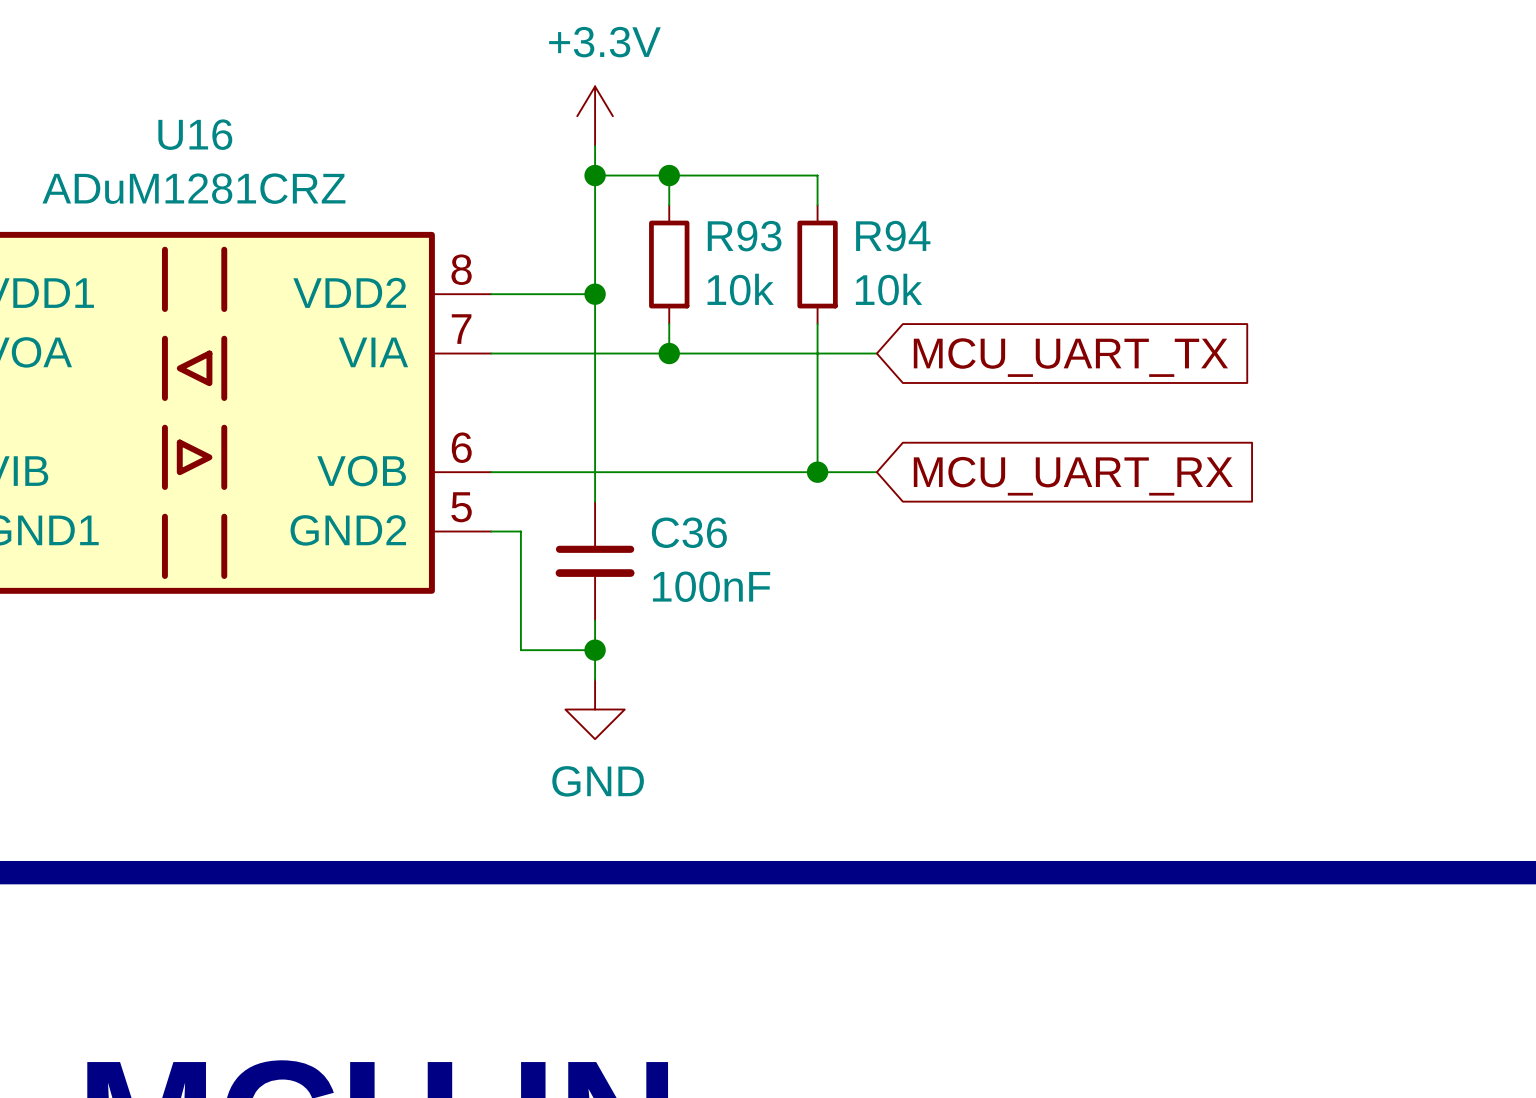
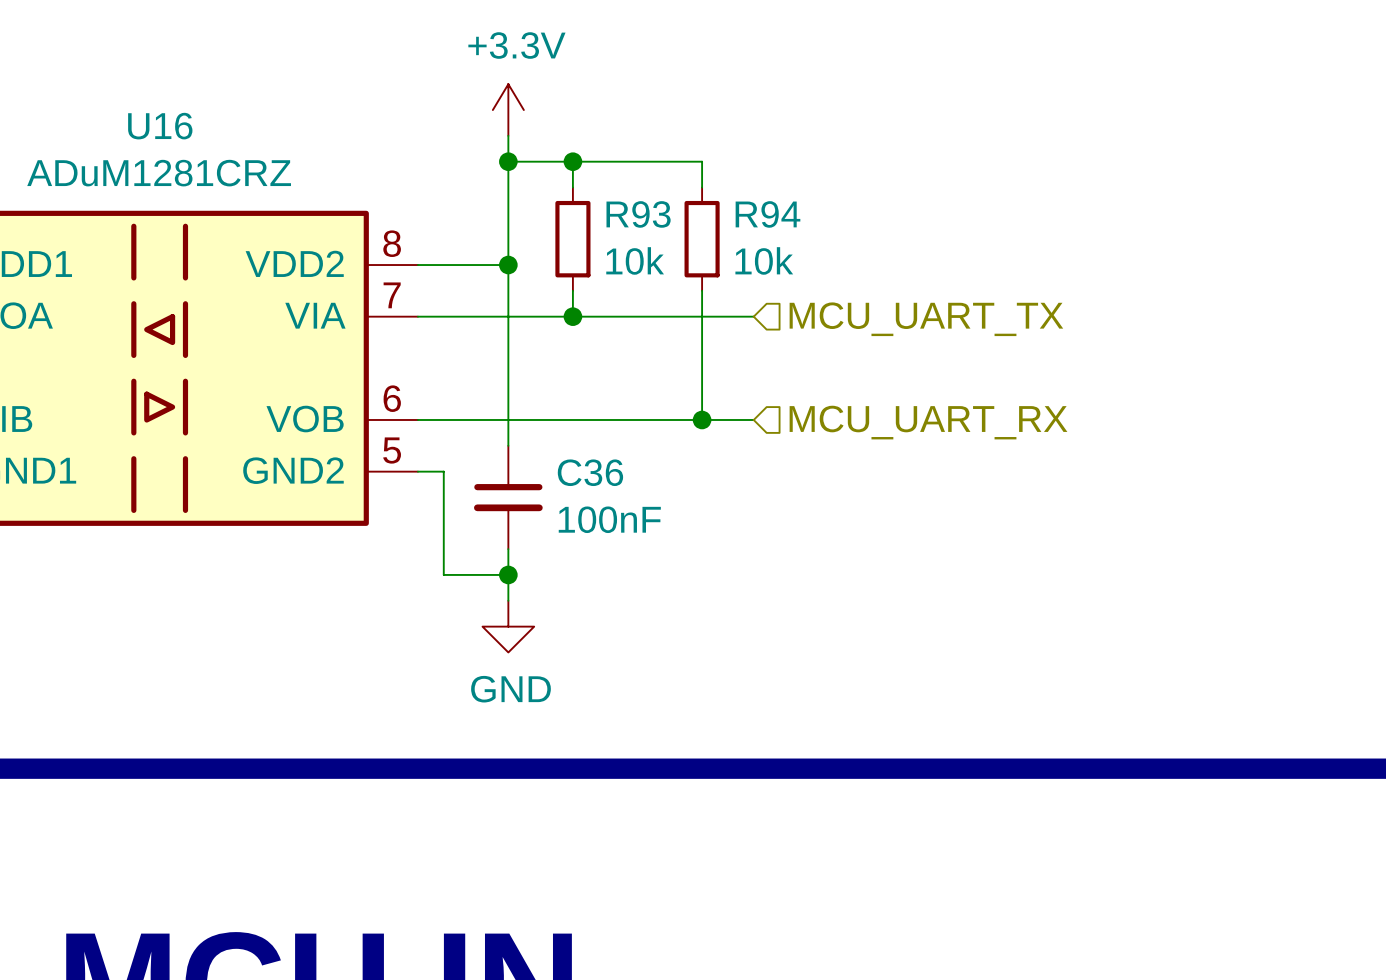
hierarchical label: none -> MCU_UART_TX (926, 319)
global label: MCU_UART_TX (1070, 357) -> none
hierarchical label: none -> MCU_UART_RX (928, 422)
global label: MCU_UART_RX (1073, 476) -> none

